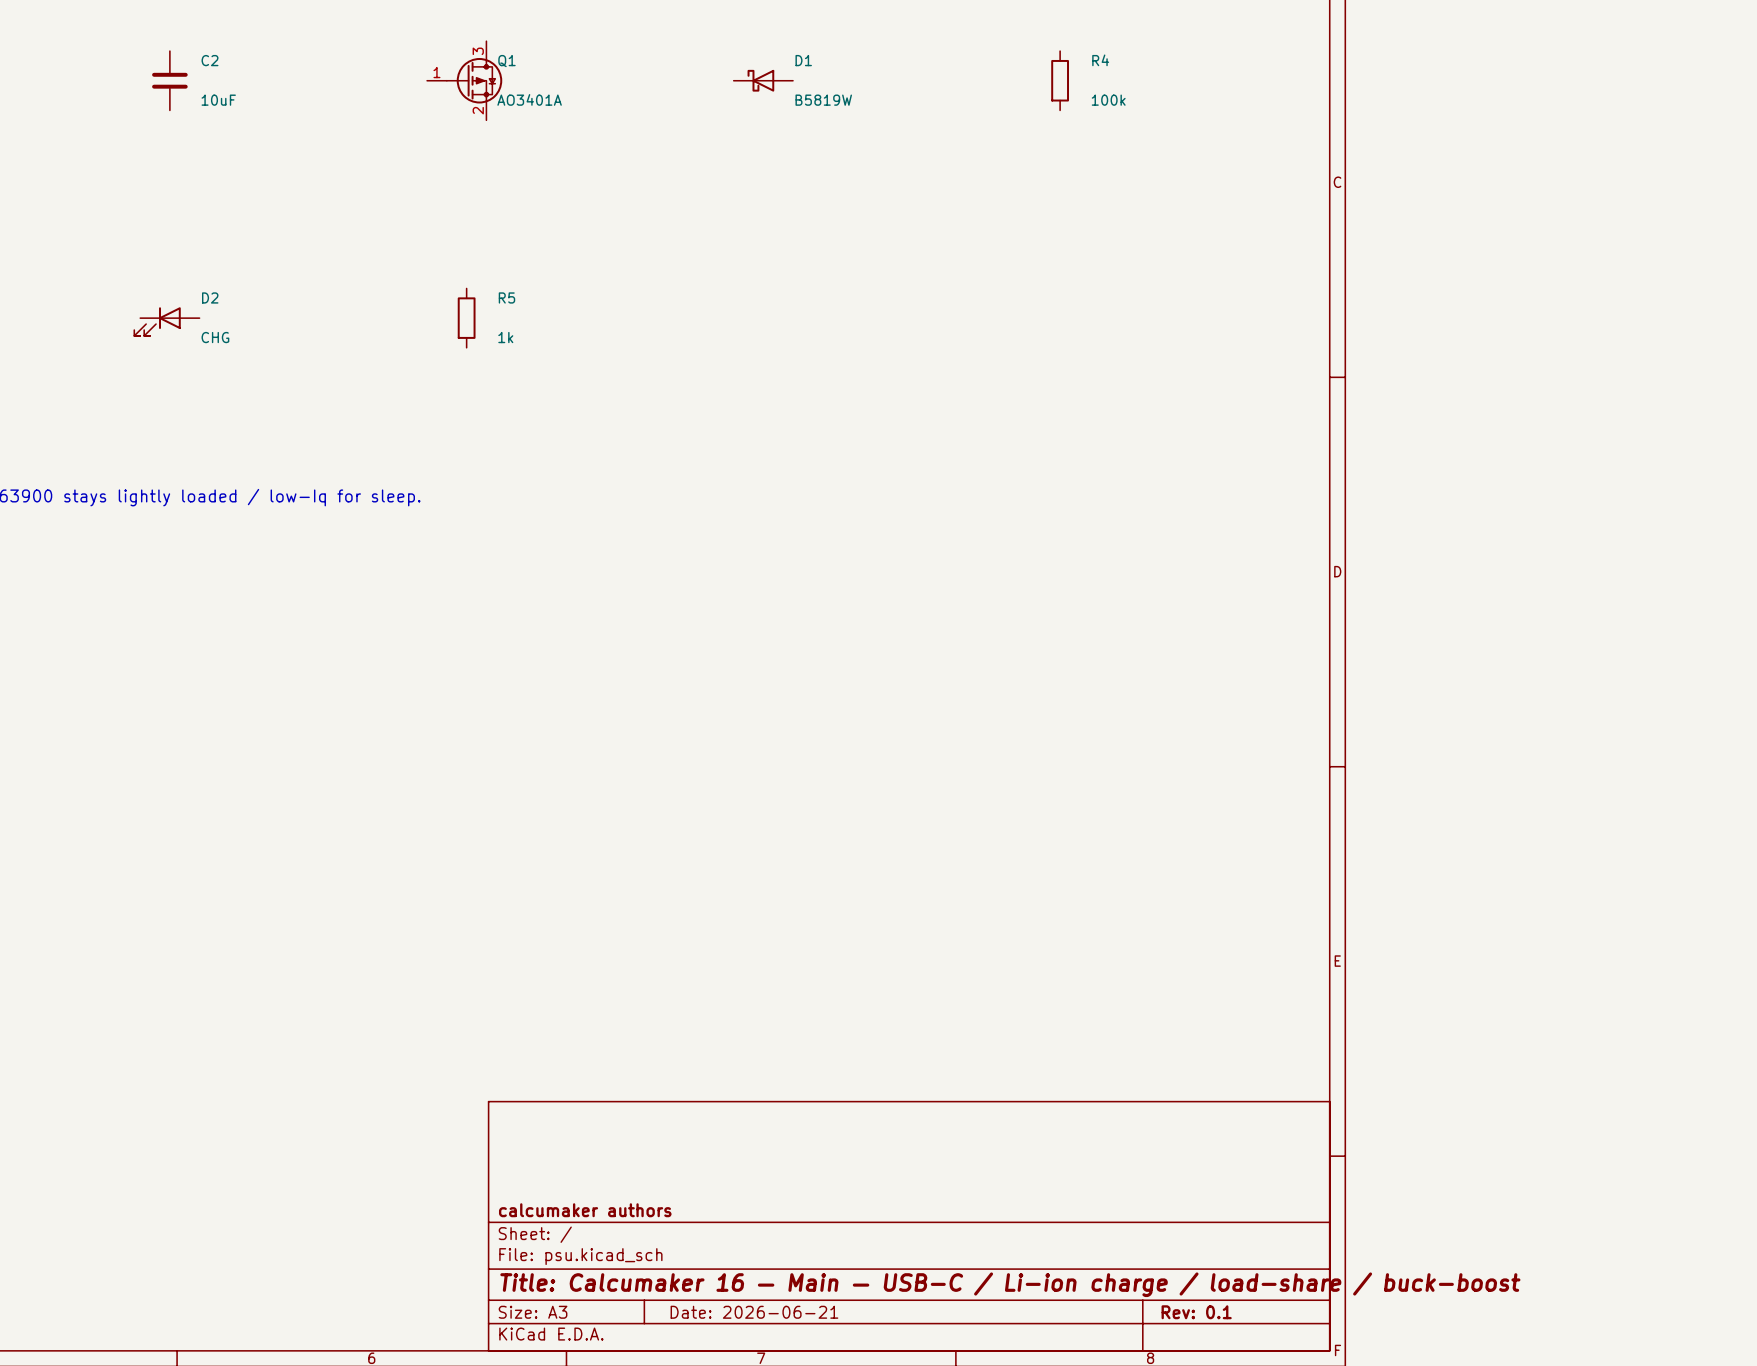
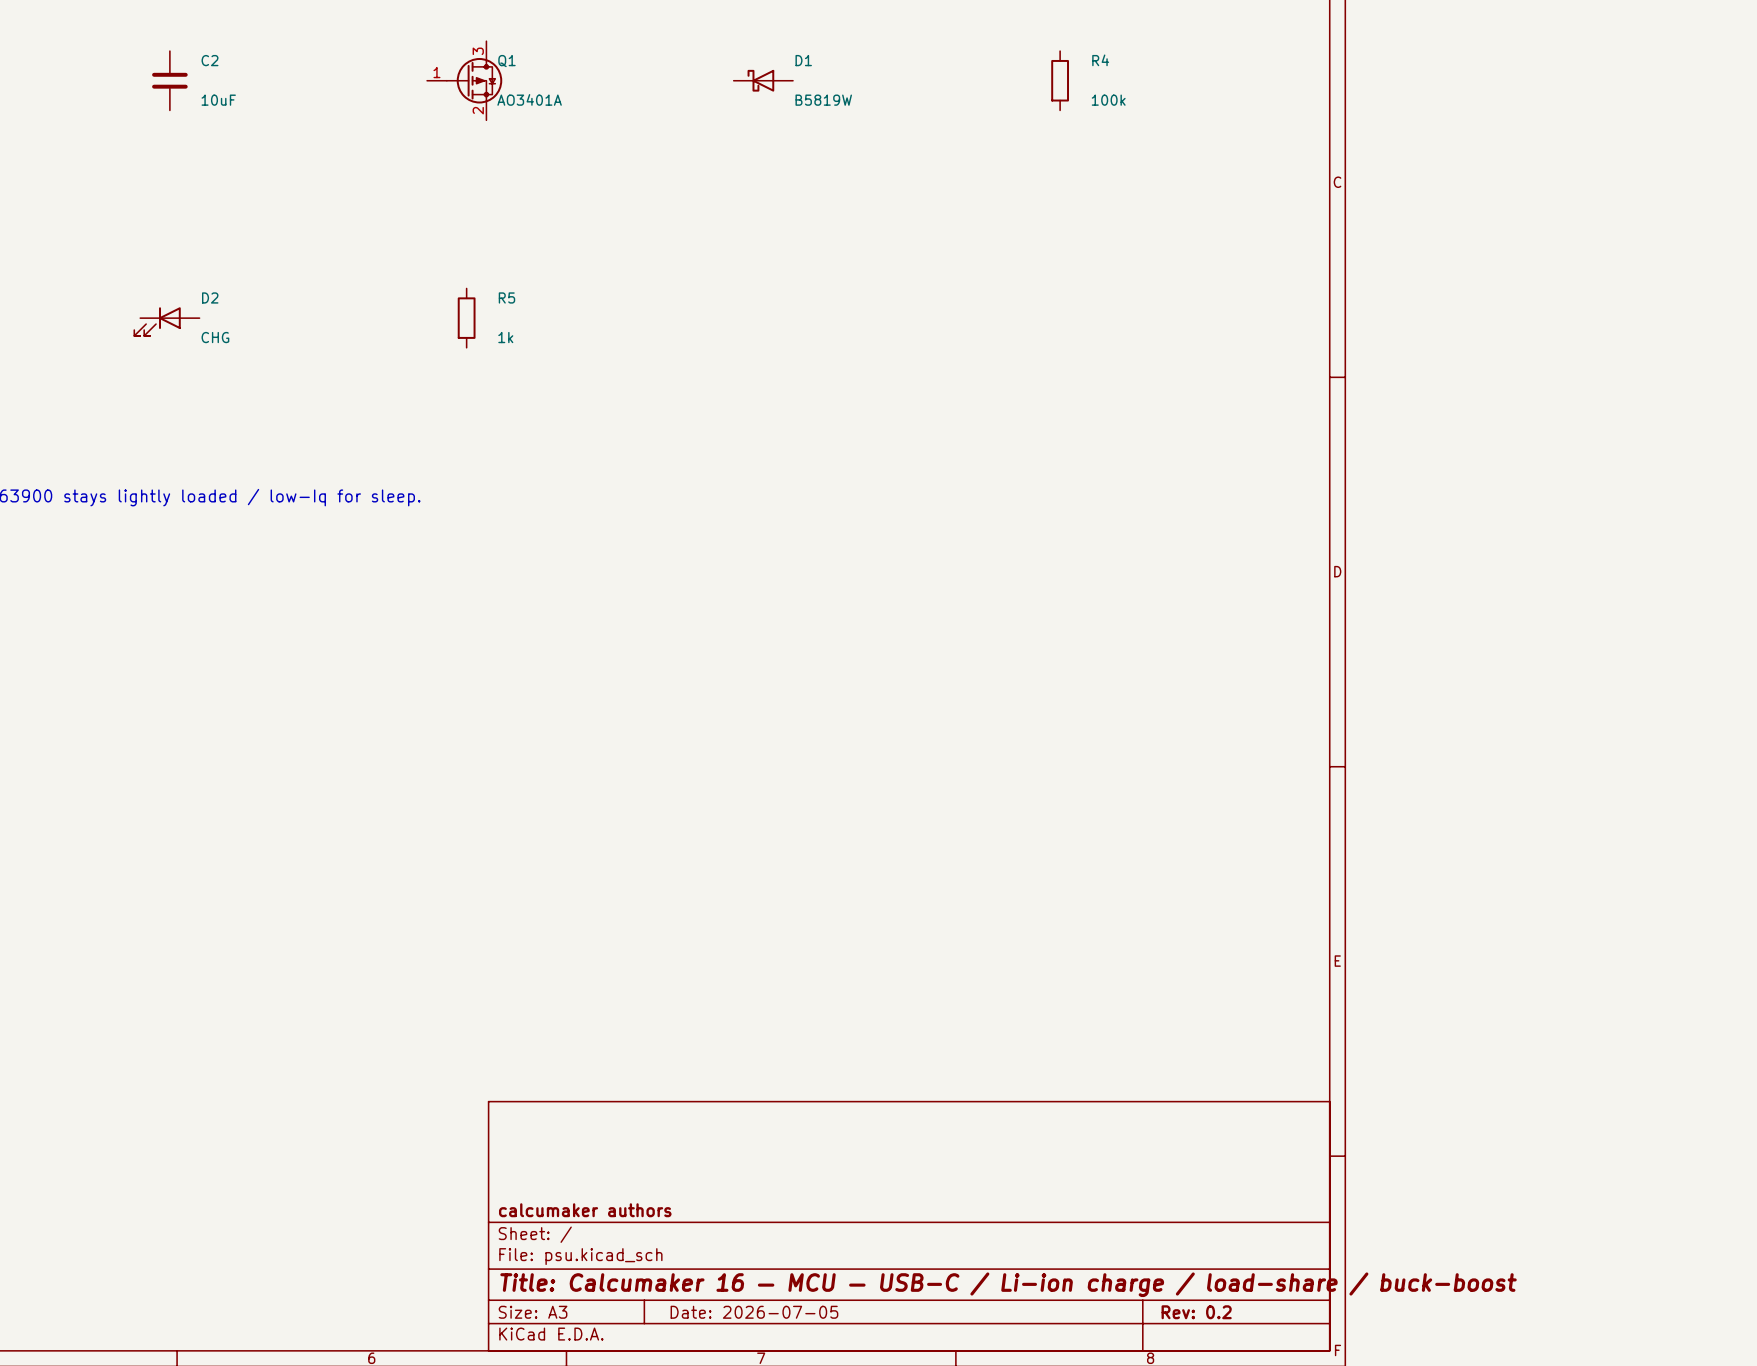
title block: Title: Calcumaker 16 — Main — USB-C / Li-ion charge / load-share / buck-boost (1010, 1284) -> Title: Calcumaker 16 — MCU — USB-C / Li-ion charge / load-share / buck-boost (1008, 1284)
title block: Date: 2026-06-21 (754, 1312) -> Date: 2026-07-05 (754, 1312)
title block: Rev: 0.1 (1196, 1312) -> Rev: 0.2 (1196, 1312)

